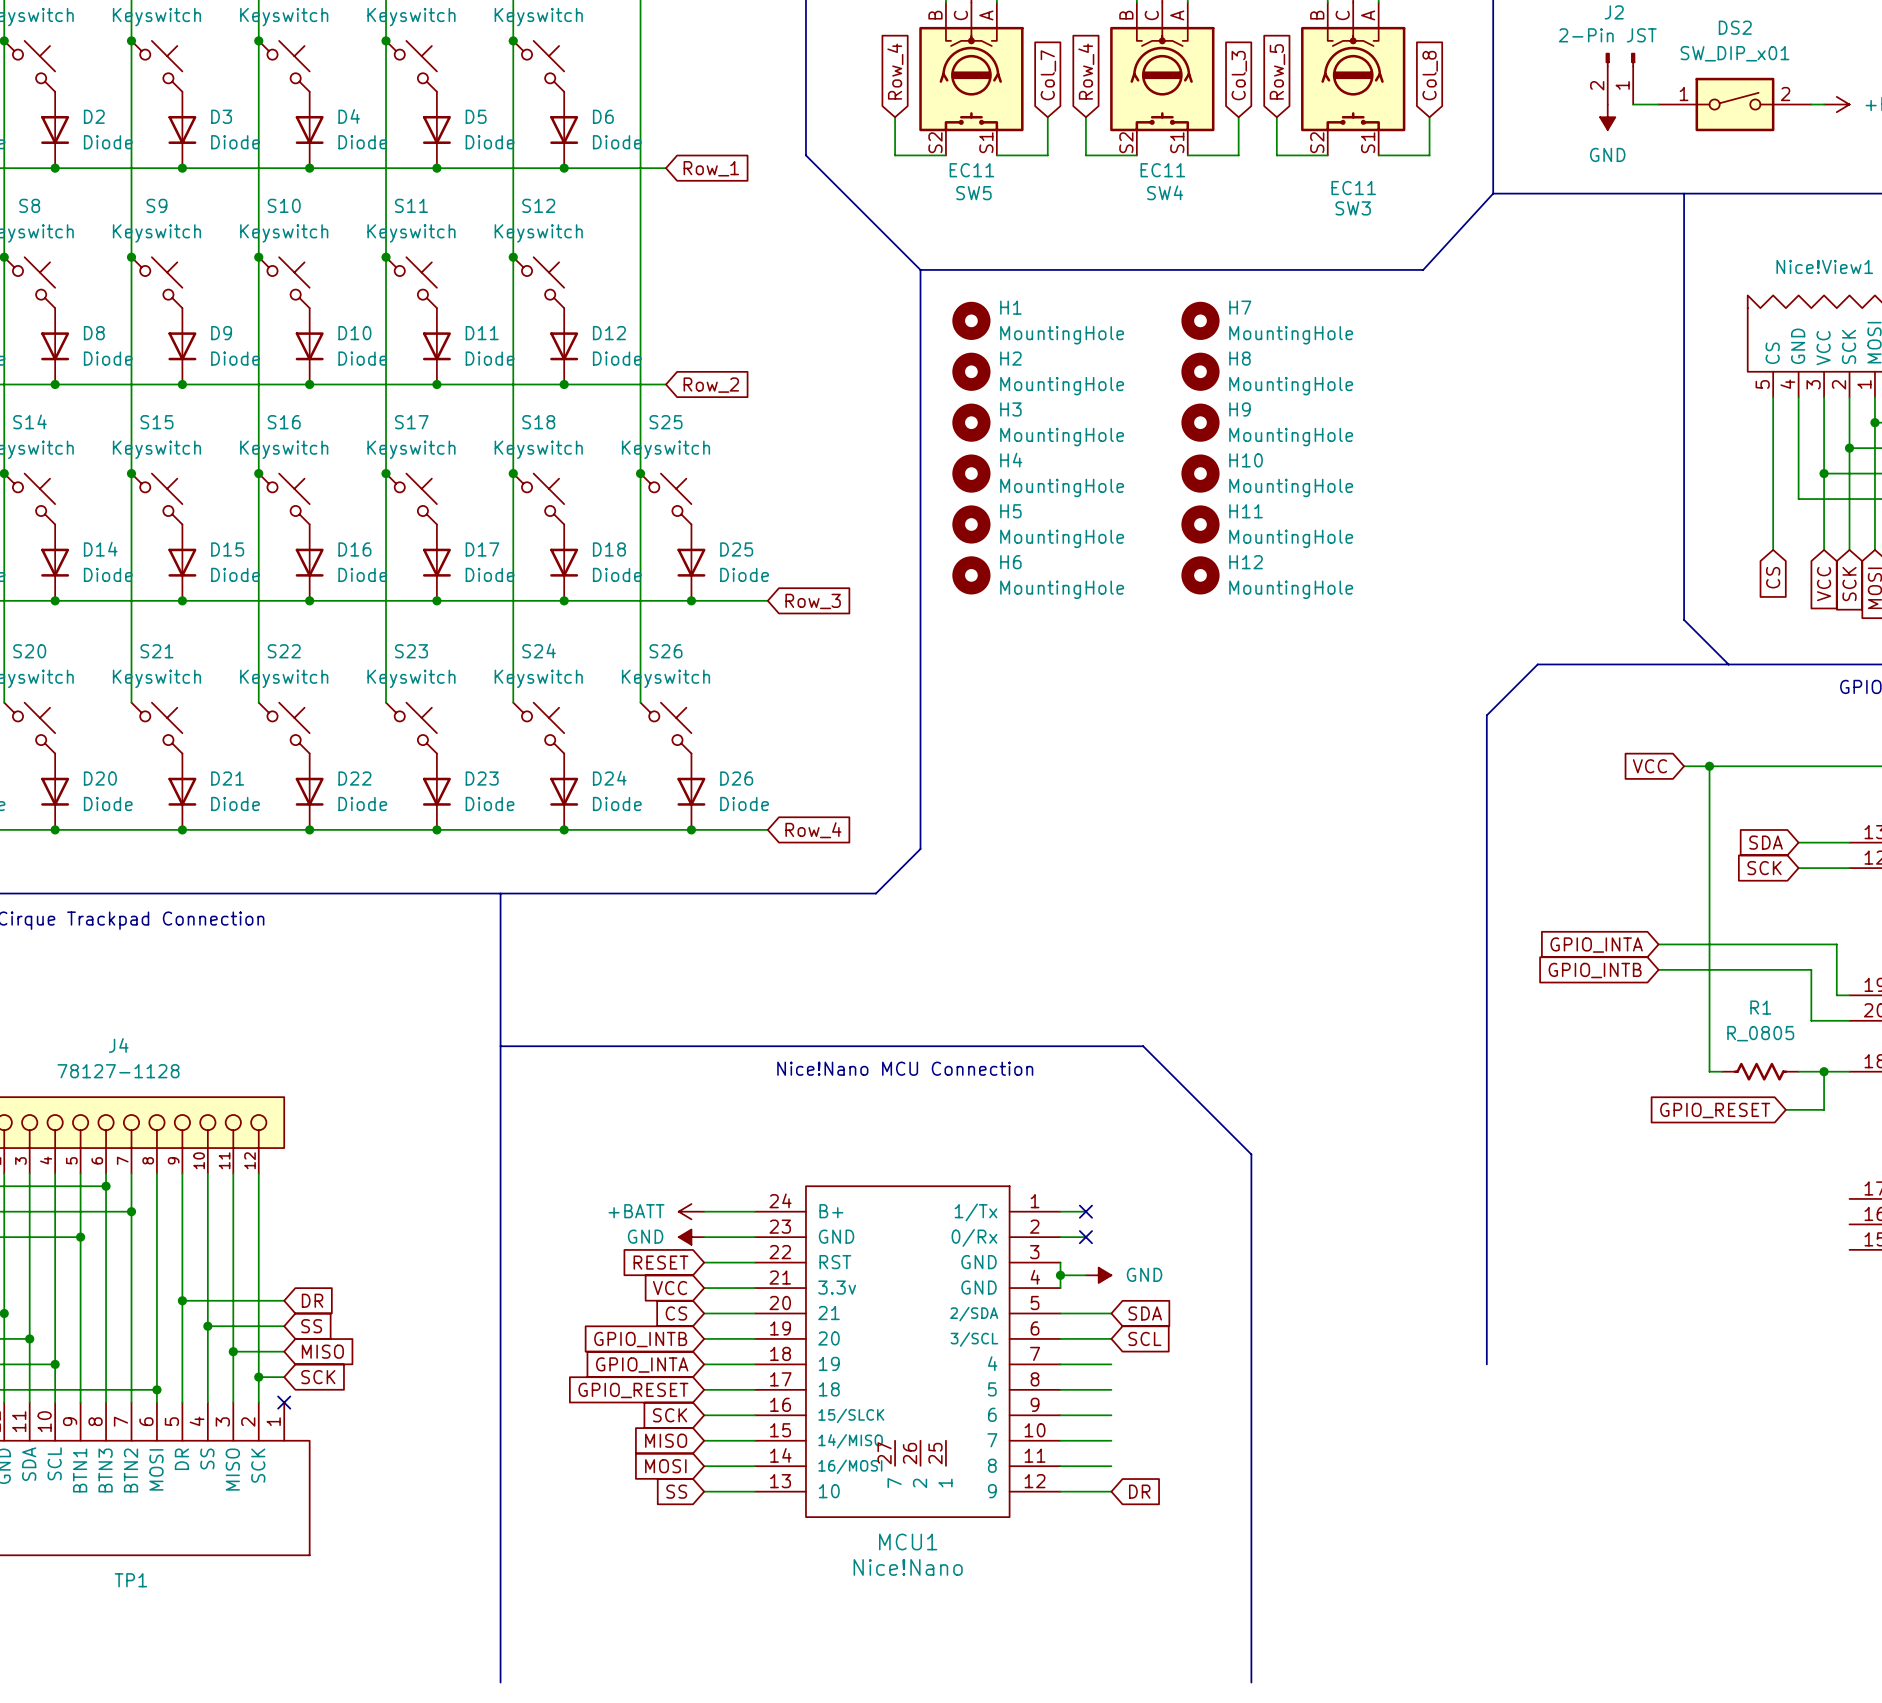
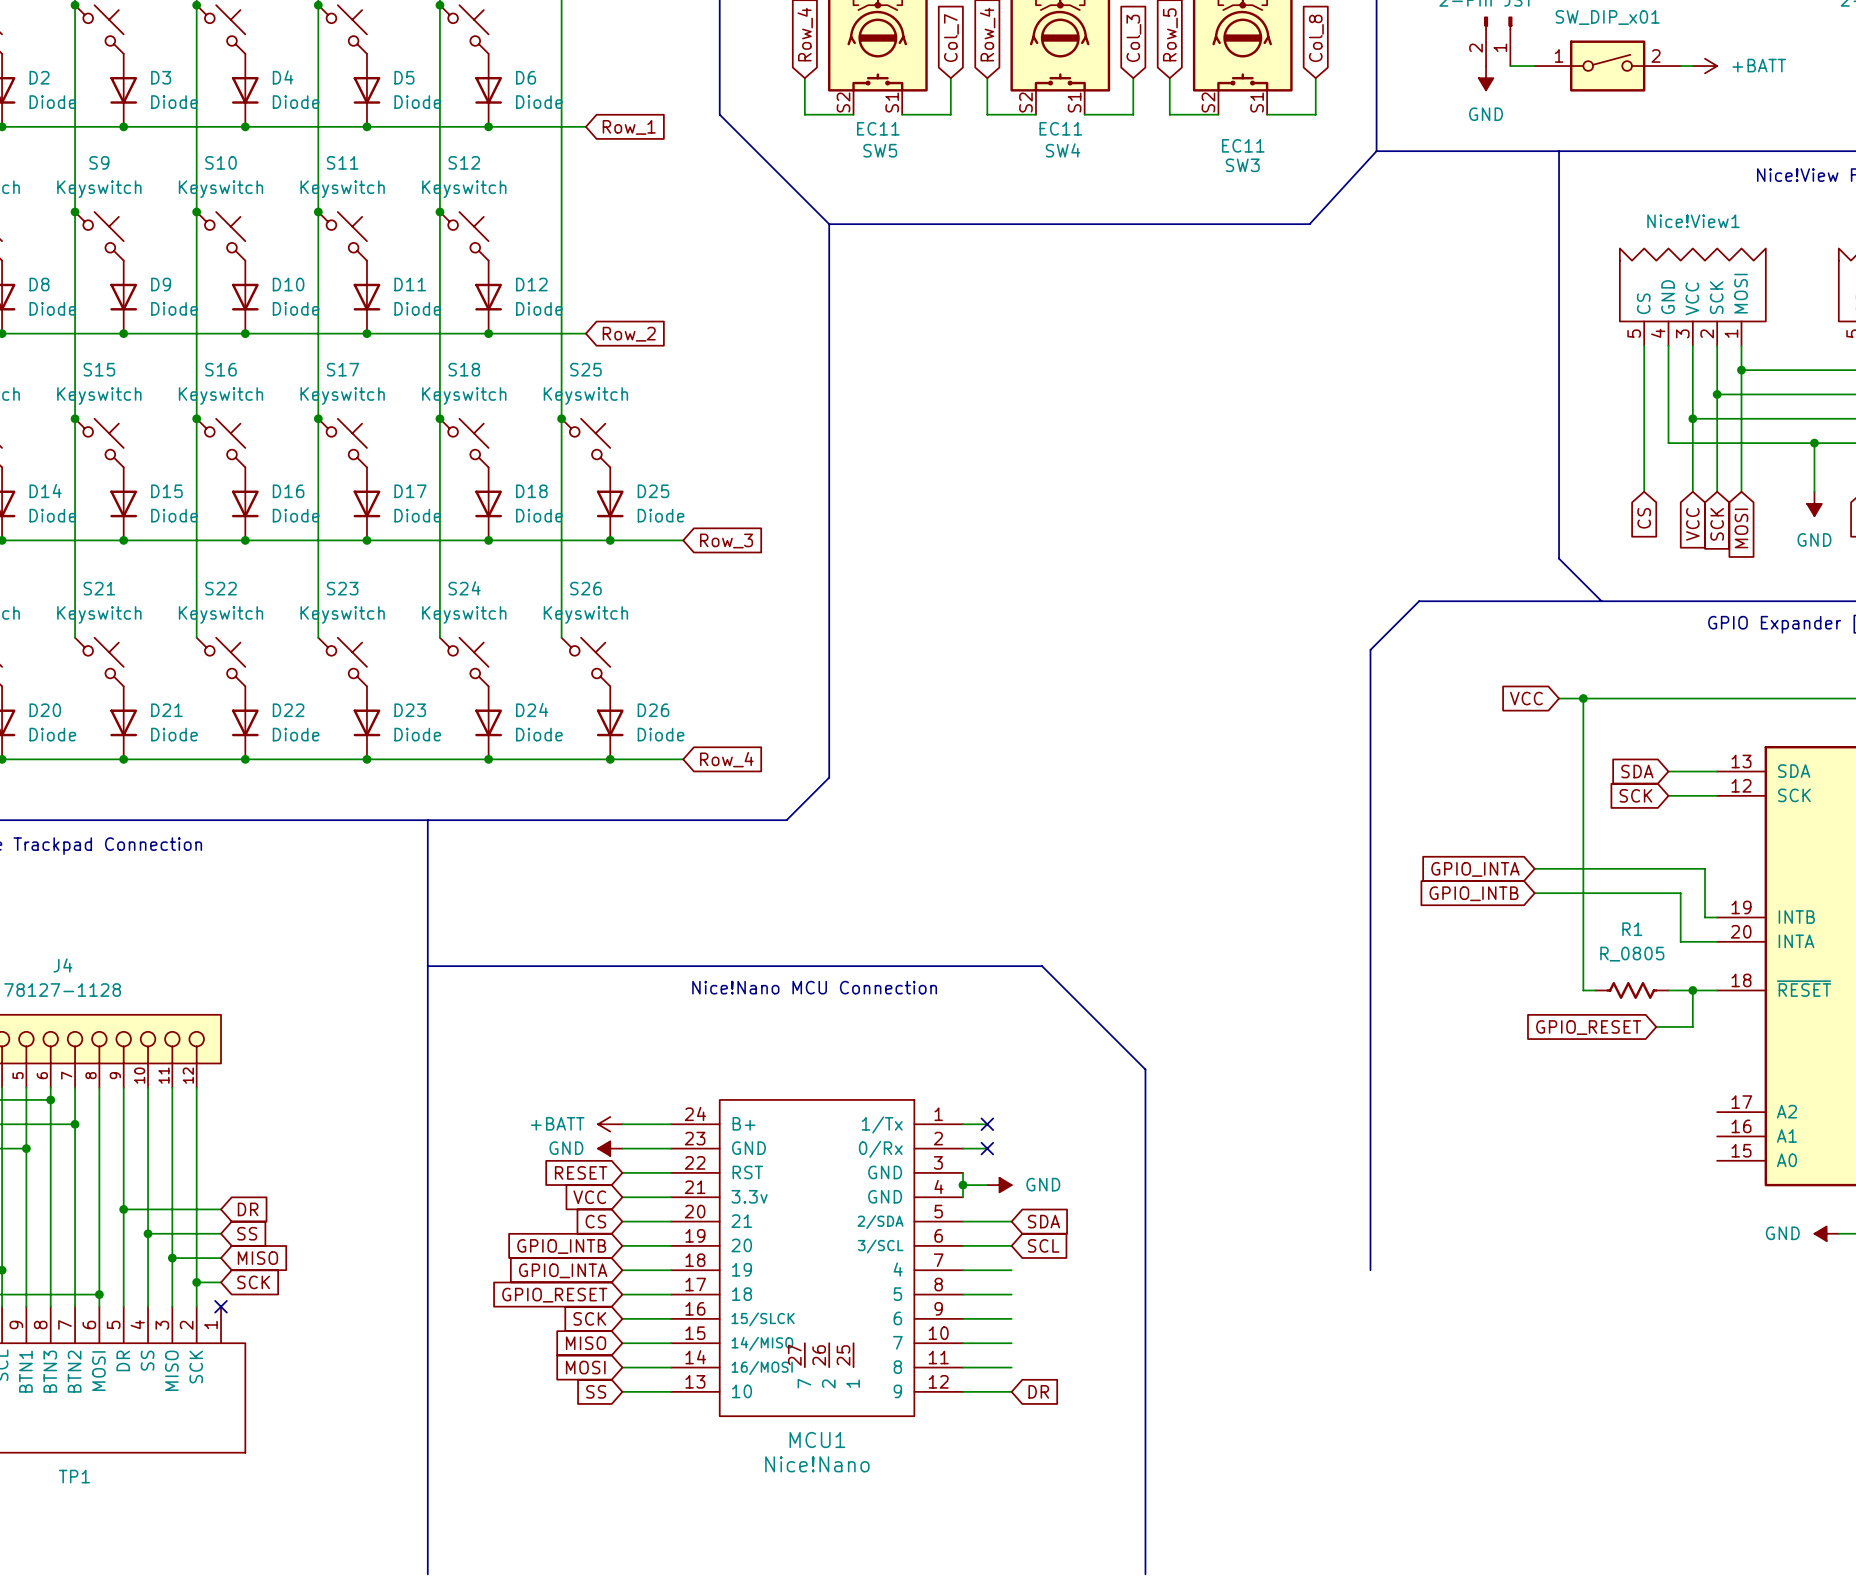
H1: MountingHole (971, 320) -> none
H7: MountingHole (1200, 320) -> none
H2: MountingHole (971, 371) -> none
H8: MountingHole (1200, 371) -> none
H3: MountingHole (971, 422) -> none
H9: MountingHole (1200, 422) -> none
H4: MountingHole (971, 473) -> none
H10: MountingHole (1200, 473) -> none
H5: MountingHole (971, 524) -> none
H11: MountingHole (1200, 524) -> none
H6: MountingHole (971, 575) -> none
H12: MountingHole (1200, 575) -> none

